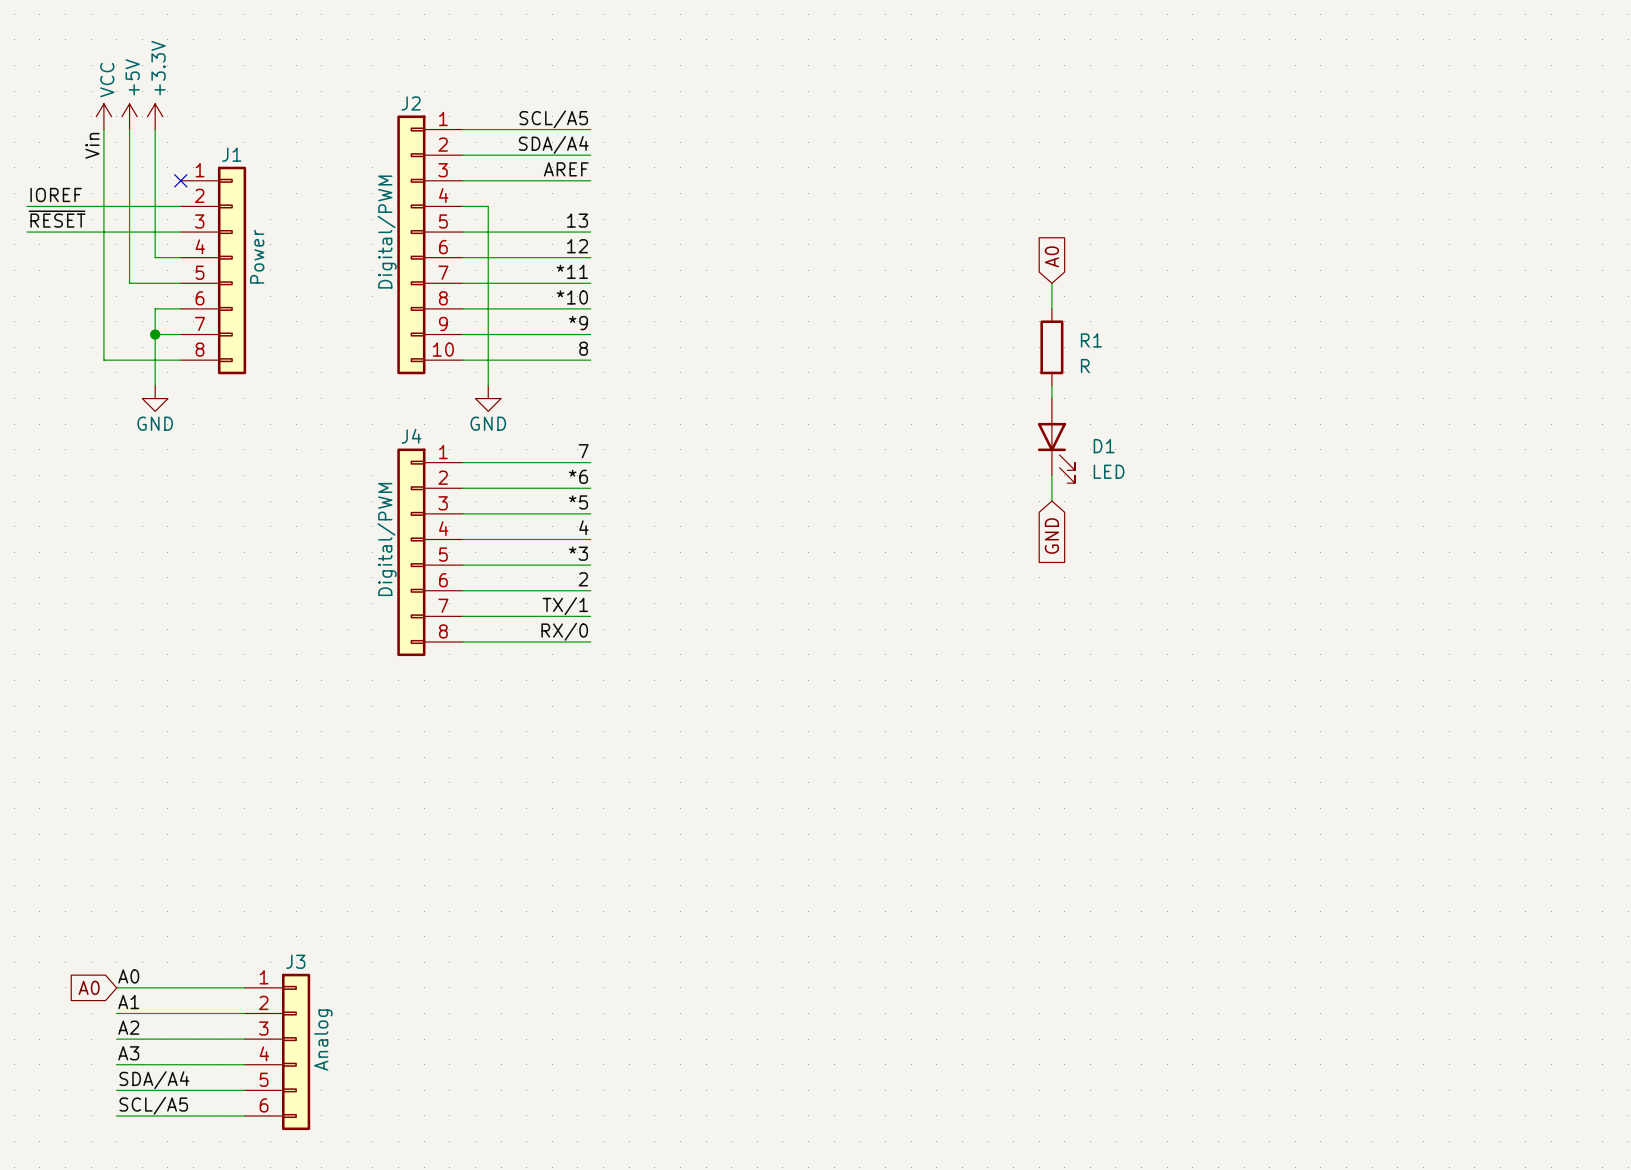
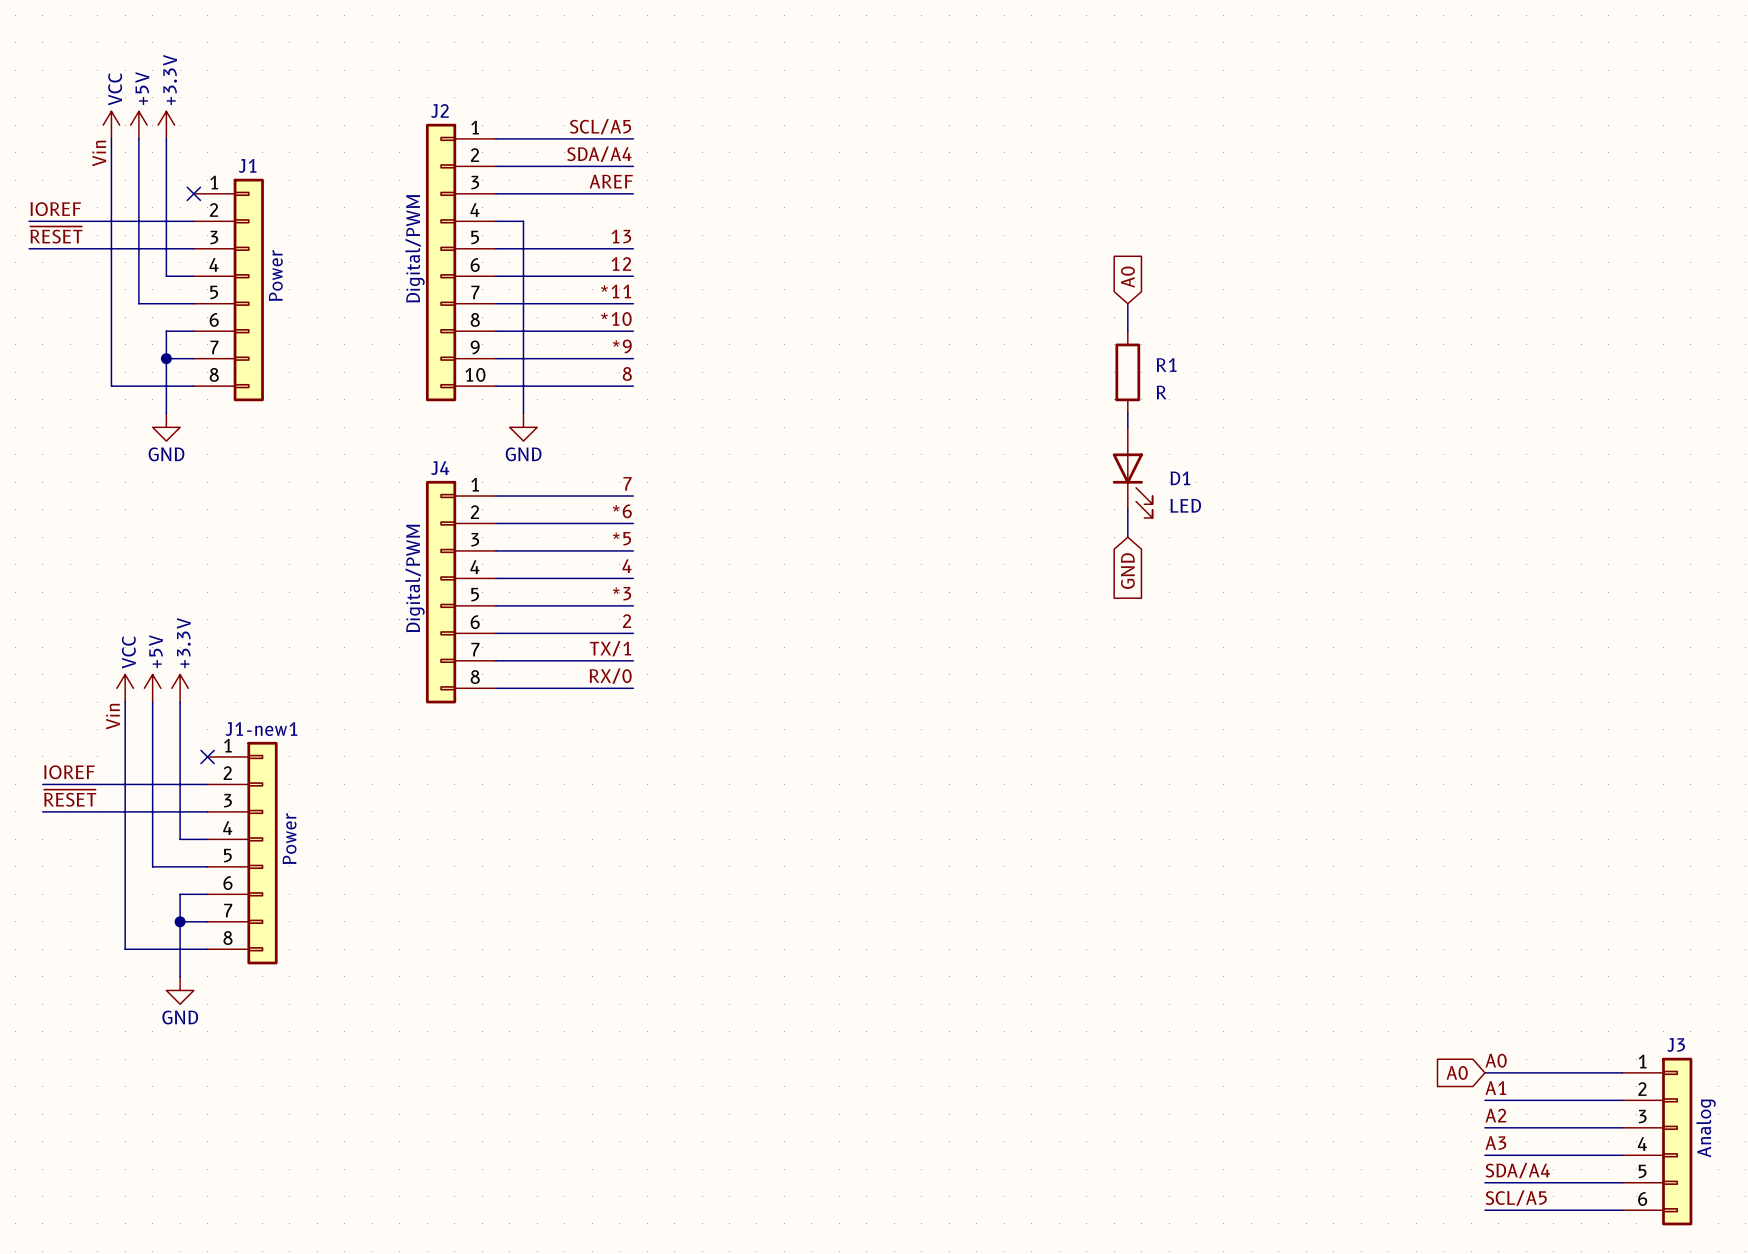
power symbol: none -> VCC (125, 688)
power symbol: none -> +5V (152, 688)
power symbol: none -> +3.3V (180, 688)
wire: none -> (125, 702) (125, 949) (207, 949)
wire: none -> (152, 702) (152, 866) (207, 866)
wire: none -> (180, 702) (180, 839) (207, 839)
label: none -> Vin (113, 716)
no-connect mark: none -> (207, 756)
label: none -> IOREF (69, 772)
wire: none -> (42, 784) (207, 784)
label: none -> ~{RESET} (70, 798)
wire: none -> (42, 811) (207, 811)
J1-new1: none -> Power (242, 853)
wire: none -> (207, 894) (180, 894) (180, 976)
wire: none -> (180, 921) (207, 921)
junction: none -> (180, 921)
power symbol: none -> GND (180, 990)
label: A0 (128, 976) -> none
global label: A0 (89, 987) -> none
wire: (116, 987) (244, 987) -> none
label: none -> A0 (1496, 1060)
global label: none -> A0 (1457, 1072)
wire: none -> (1484, 1072) (1622, 1072)
label: A1 (128, 1002) -> none
wire: (116, 1013) (244, 1013) -> none
label: none -> A1 (1495, 1088)
wire: none -> (1484, 1100) (1622, 1100)
label: A2 (128, 1027) -> none
wire: (116, 1039) (244, 1039) -> none
label: none -> A2 (1495, 1115)
J3 position: (277, 1051) -> (1657, 1141)
wire: none -> (1484, 1127) (1622, 1127)
label: A3 (128, 1053) -> none
wire: (116, 1064) (244, 1064) -> none
label: none -> A3 (1495, 1143)
wire: none -> (1484, 1155) (1622, 1155)
label: SDA/A4 (154, 1080) -> none
wire: (116, 1090) (244, 1090) -> none
label: none -> SDA/A4 (1517, 1170)
wire: none -> (1484, 1182) (1622, 1182)
label: SCL/A5 (153, 1105) -> none
wire: (116, 1115) (244, 1115) -> none
label: none -> SCL/A5 (1516, 1198)
wire: none -> (1484, 1210) (1622, 1210)

